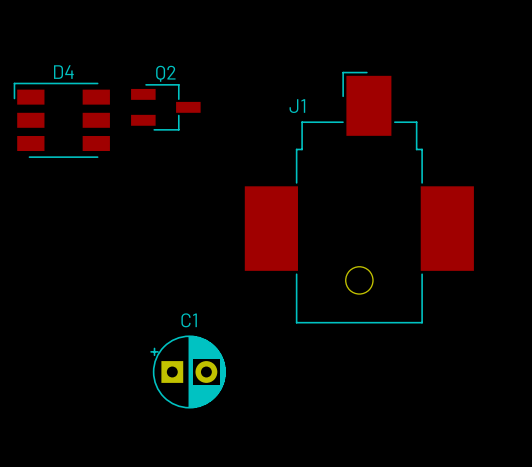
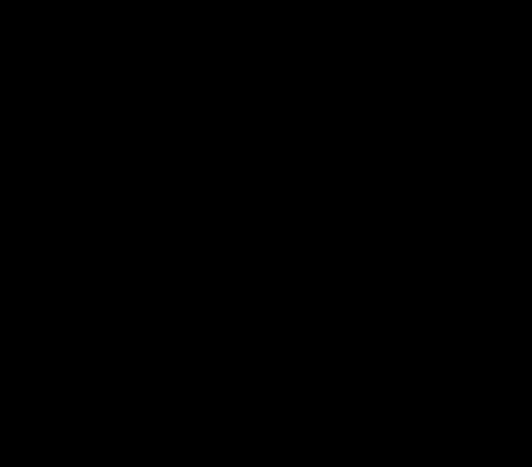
Q2: (165, 107) -> none
D4: (61, 120) -> none
J1: (359, 197) -> none
C1: (188, 371) -> none

